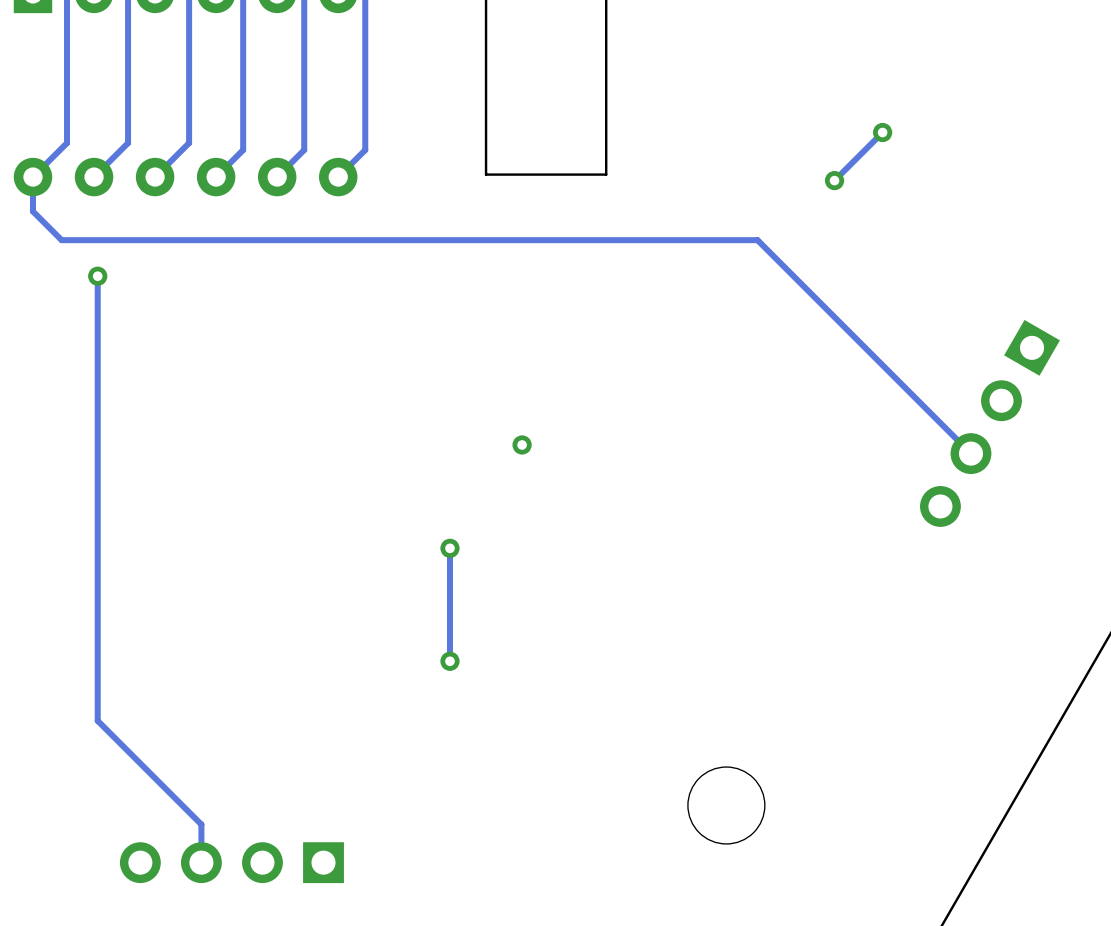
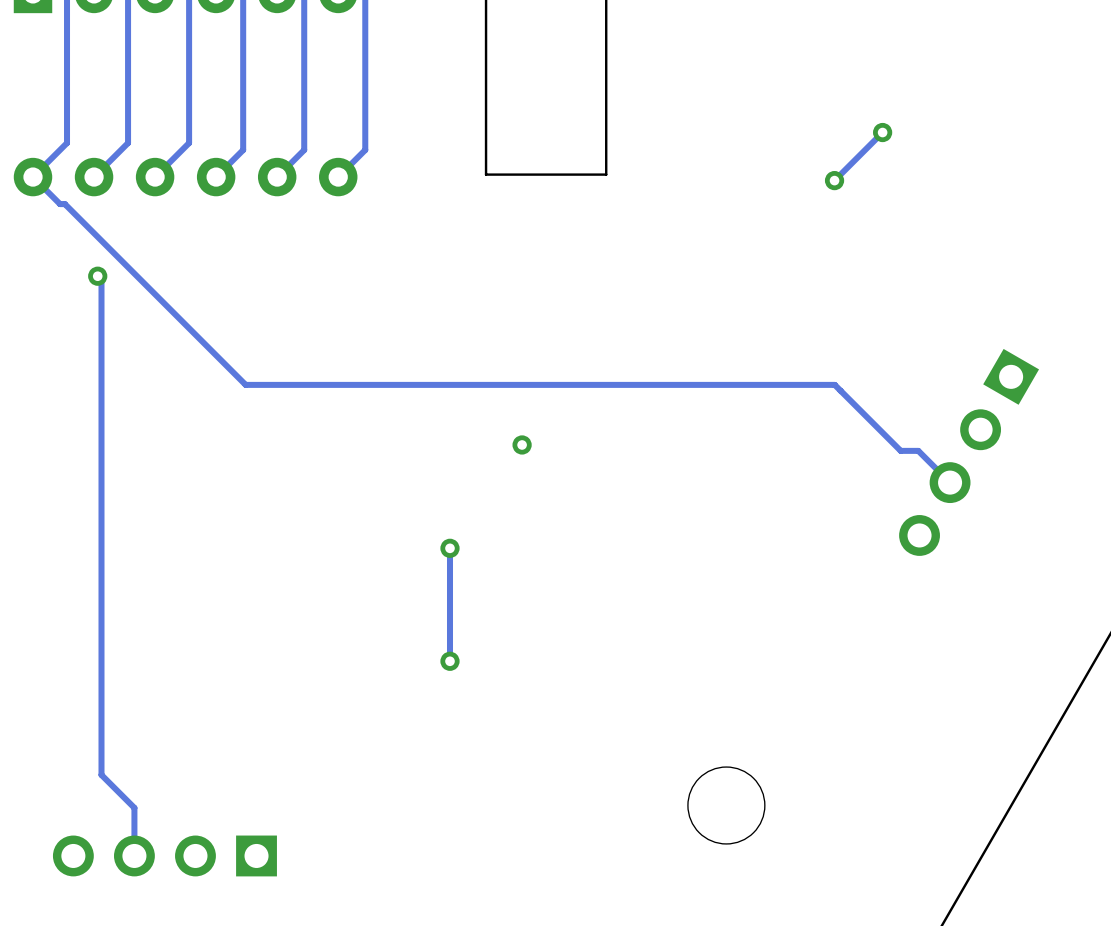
track: (32, 177) (32, 211) (61, 240) (757, 240) (970, 453) -> (33, 177) (60, 204) (64, 204) (245, 384) (834, 384) (900, 450) (918, 450) (950, 482)
track: (97, 276) (97, 720) (201, 824) (201, 862) -> none
track: none -> (101, 276) (101, 774) (134, 807) (134, 855)
part position: (989, 423) -> (969, 452)
part position: (231, 862) -> (164, 855)

